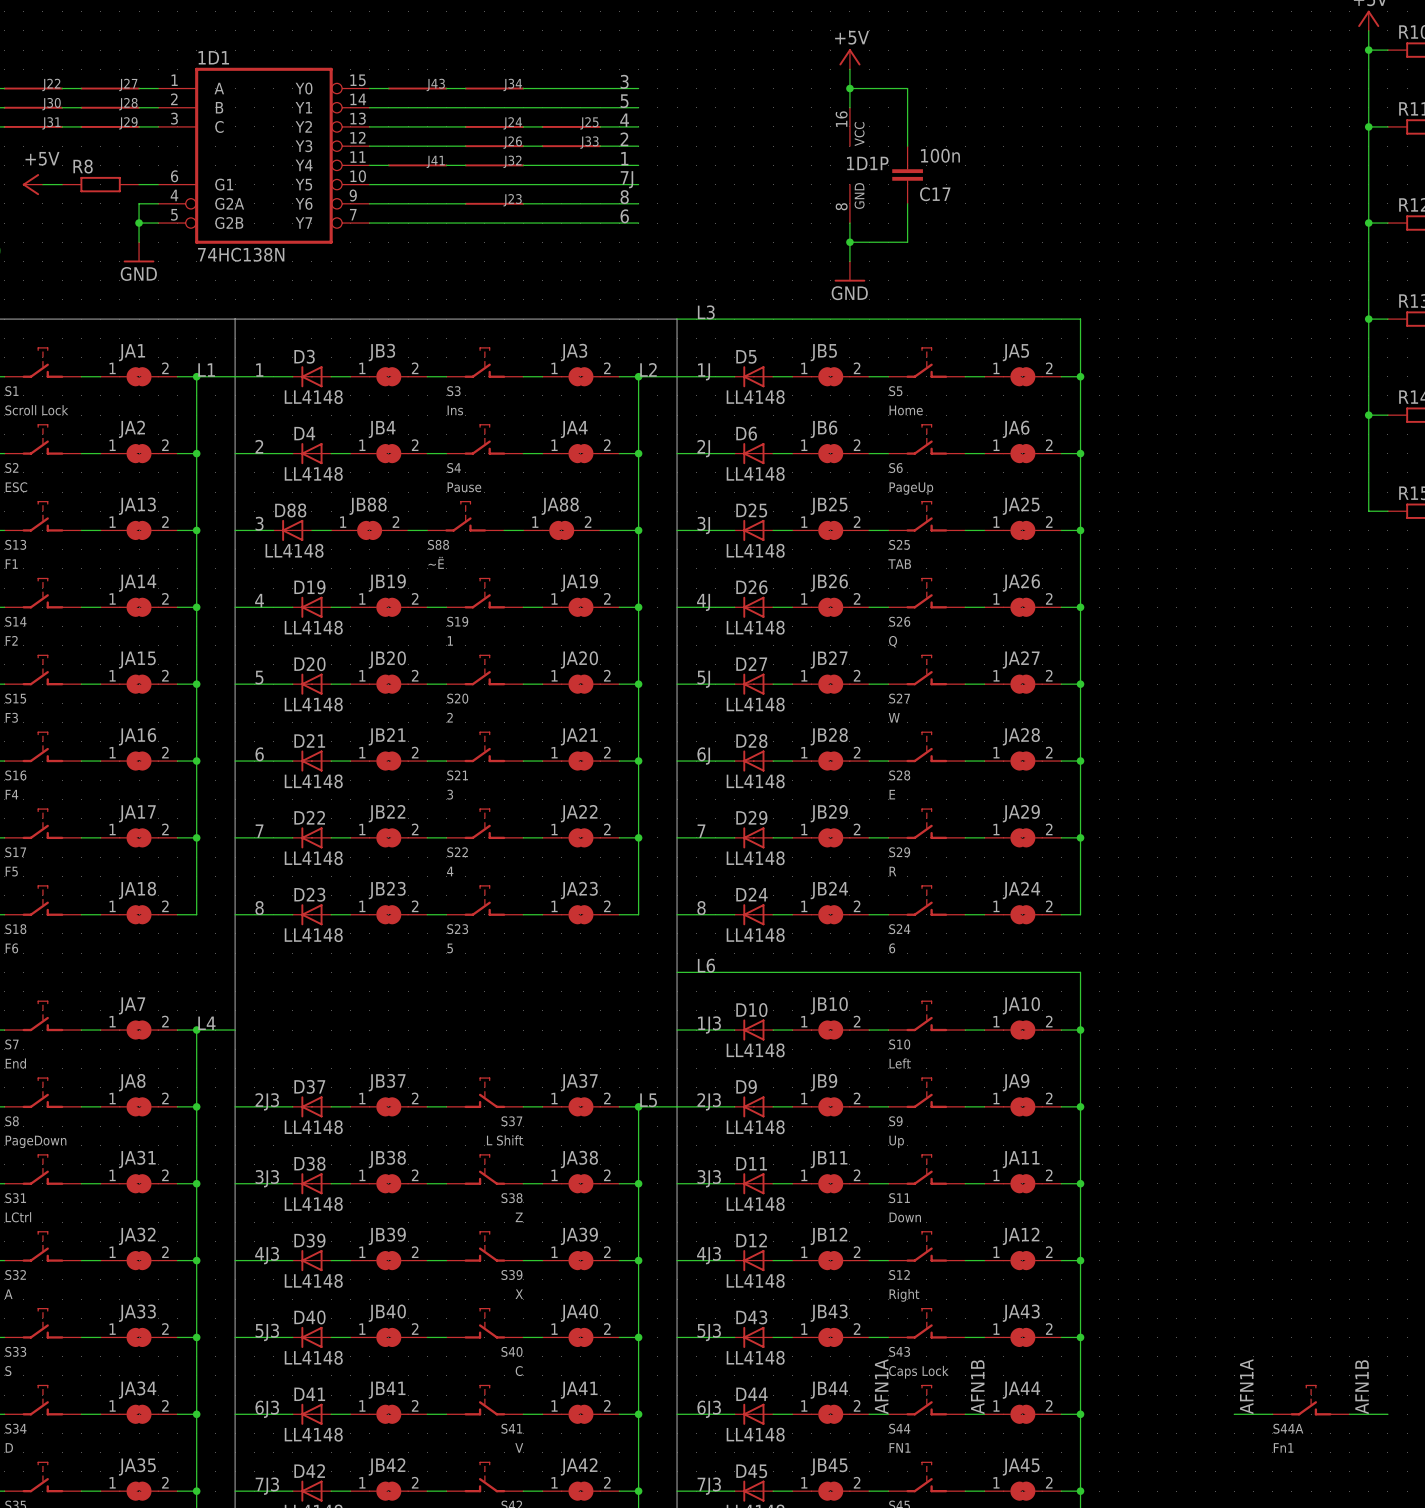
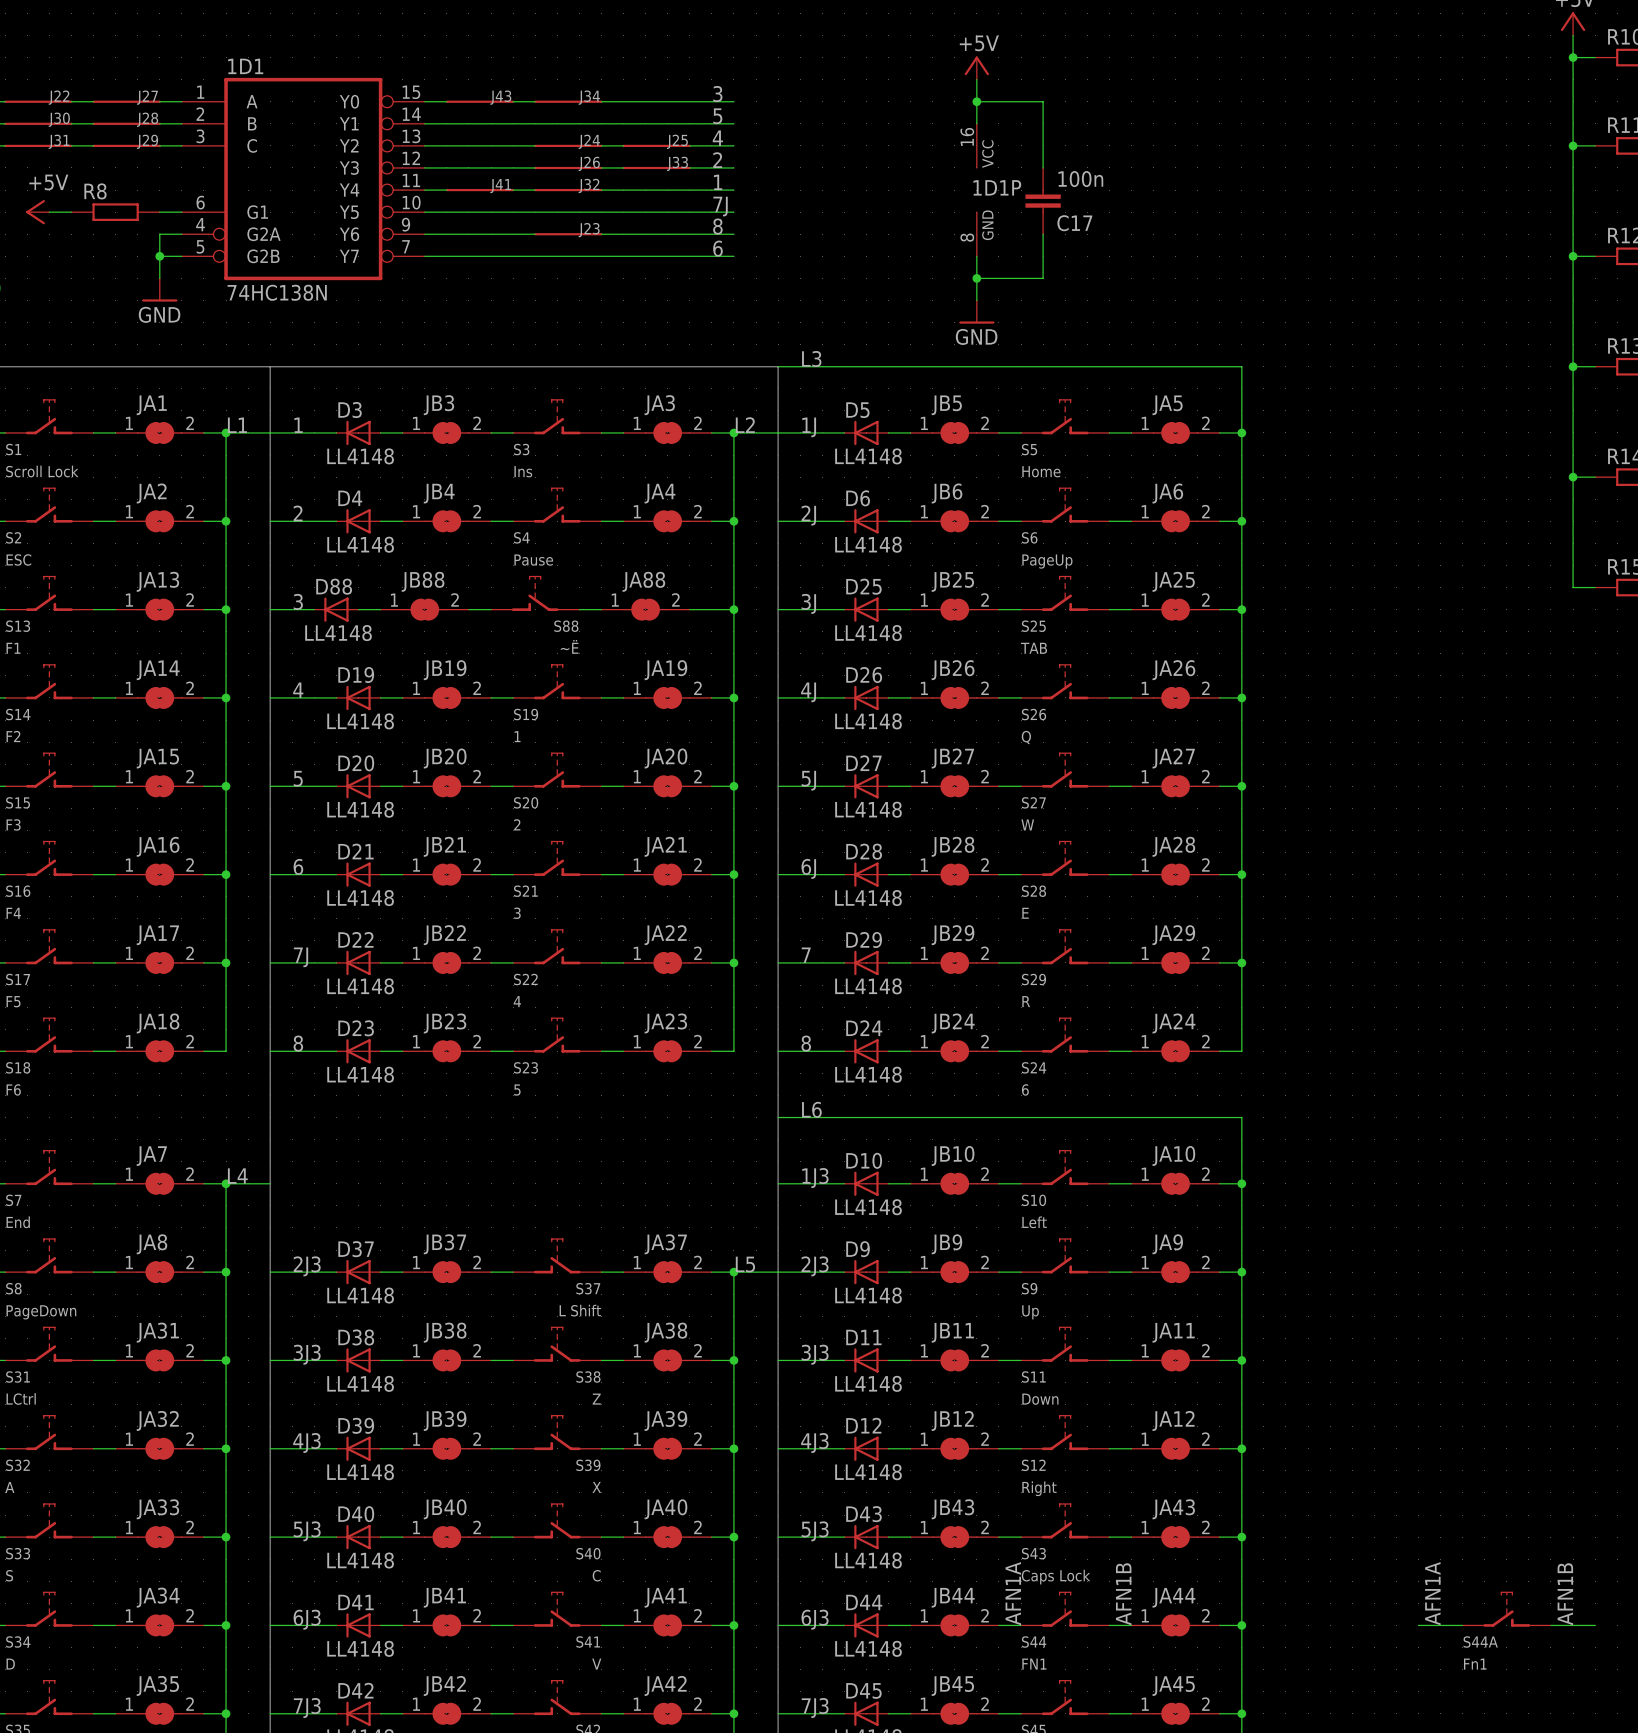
S88 flip: as is (465, 516) -> left-right (535, 593)
label: 7 (259, 831) -> 7J (301, 957)

